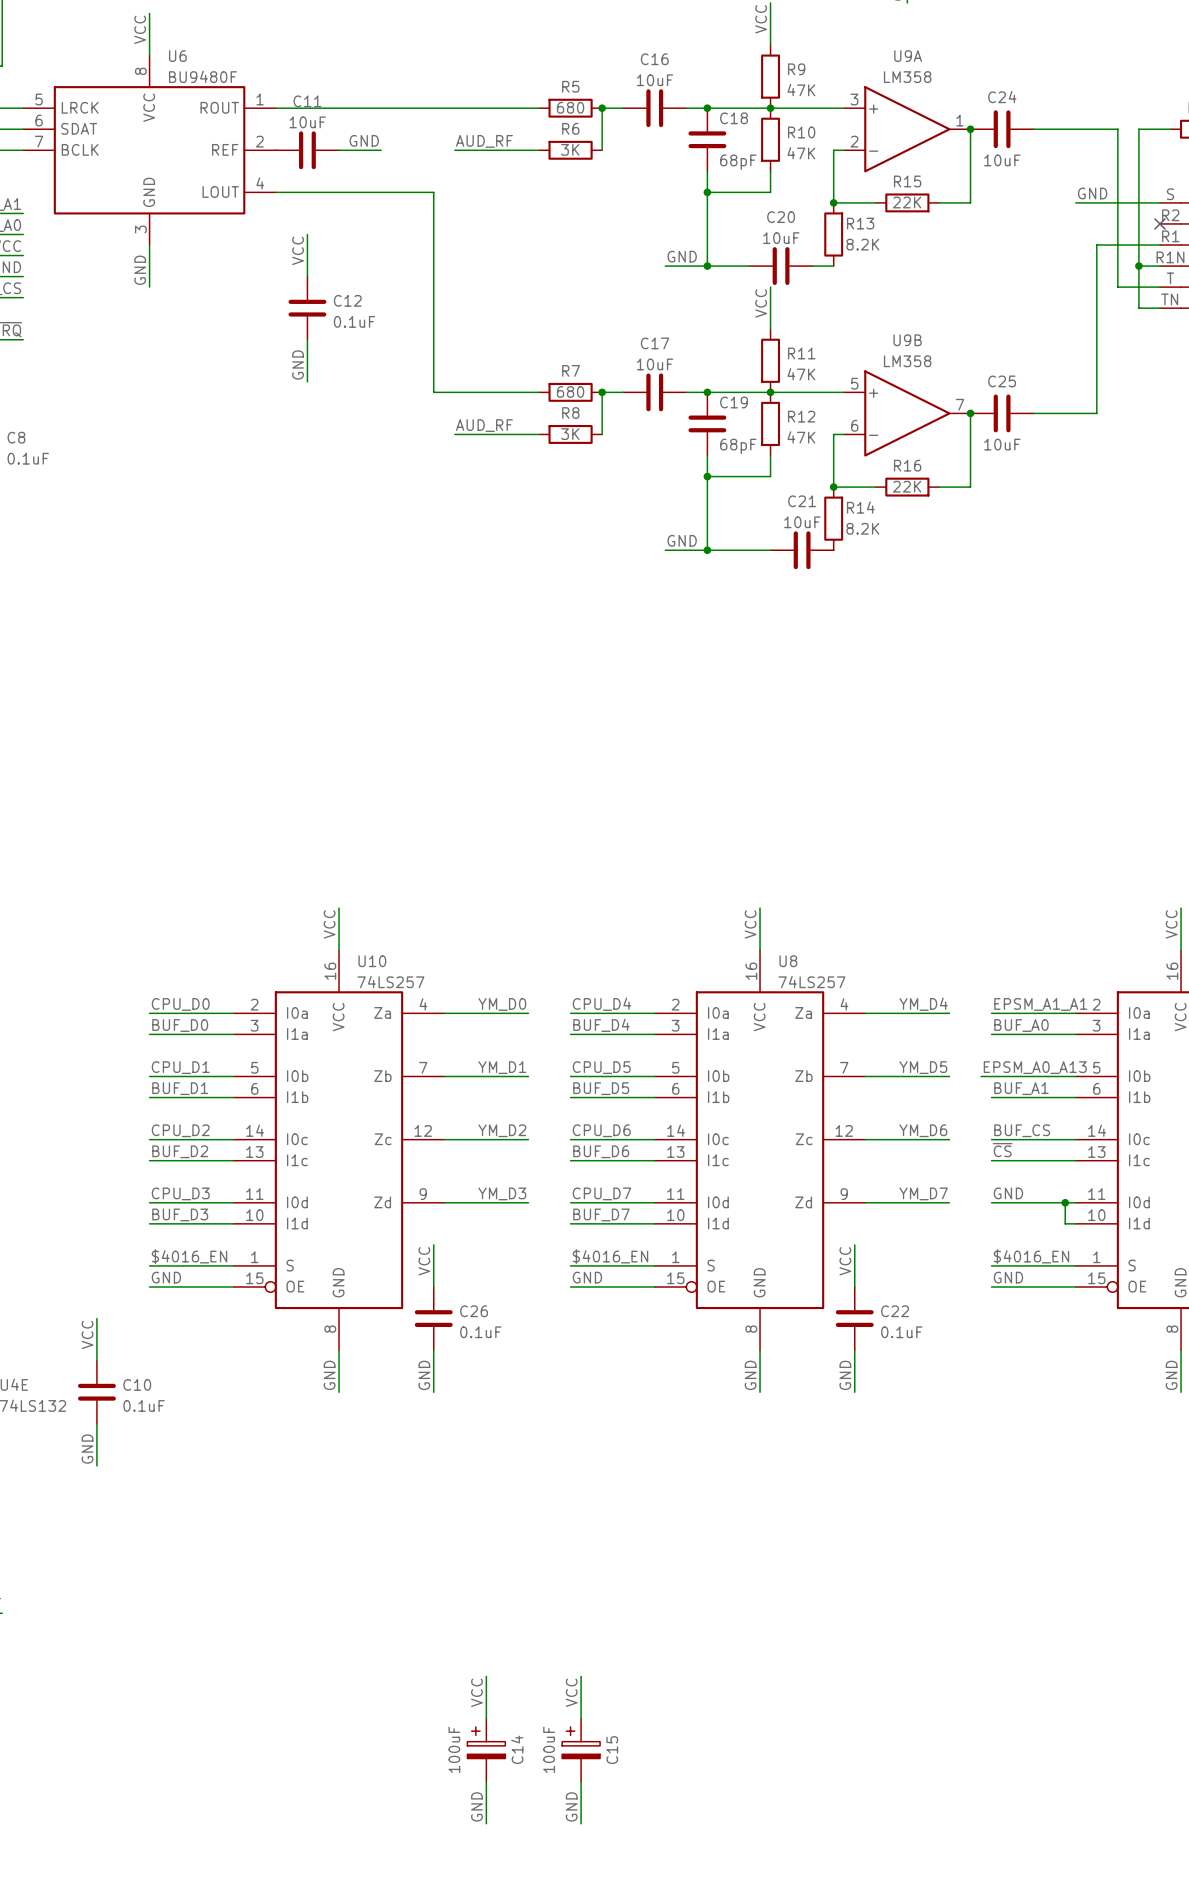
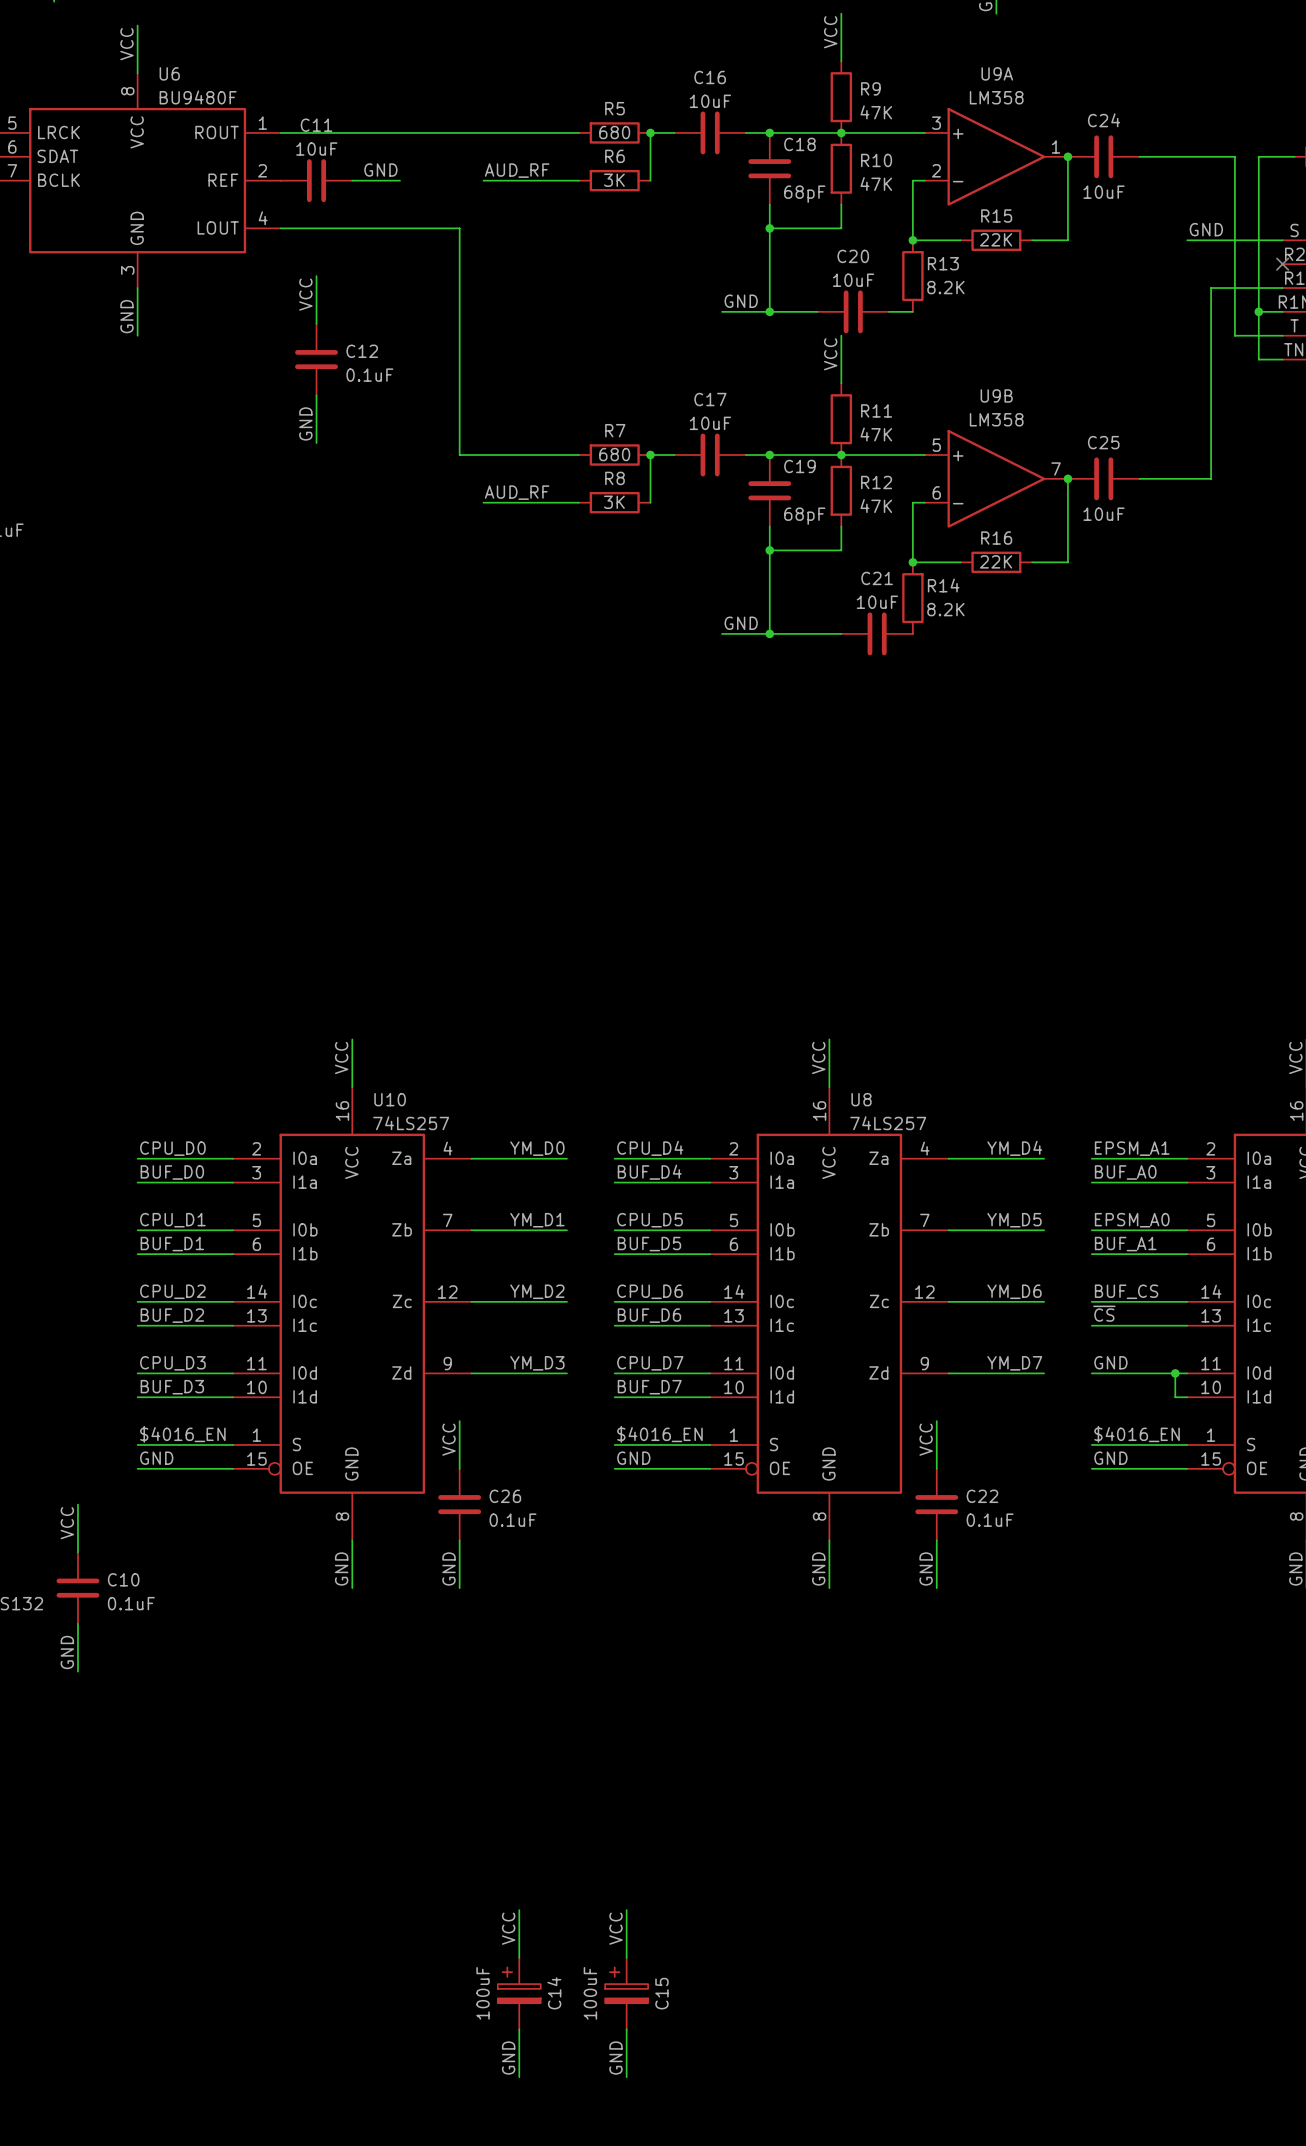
label: EPSM_A1_A1 (1040, 1004) -> EPSM_A1 (1132, 1148)
label: EPSM_A0_A13 (1035, 1067) -> EPSM_A0 (1132, 1220)
wire: (981, 1076) (991, 1076) -> none

